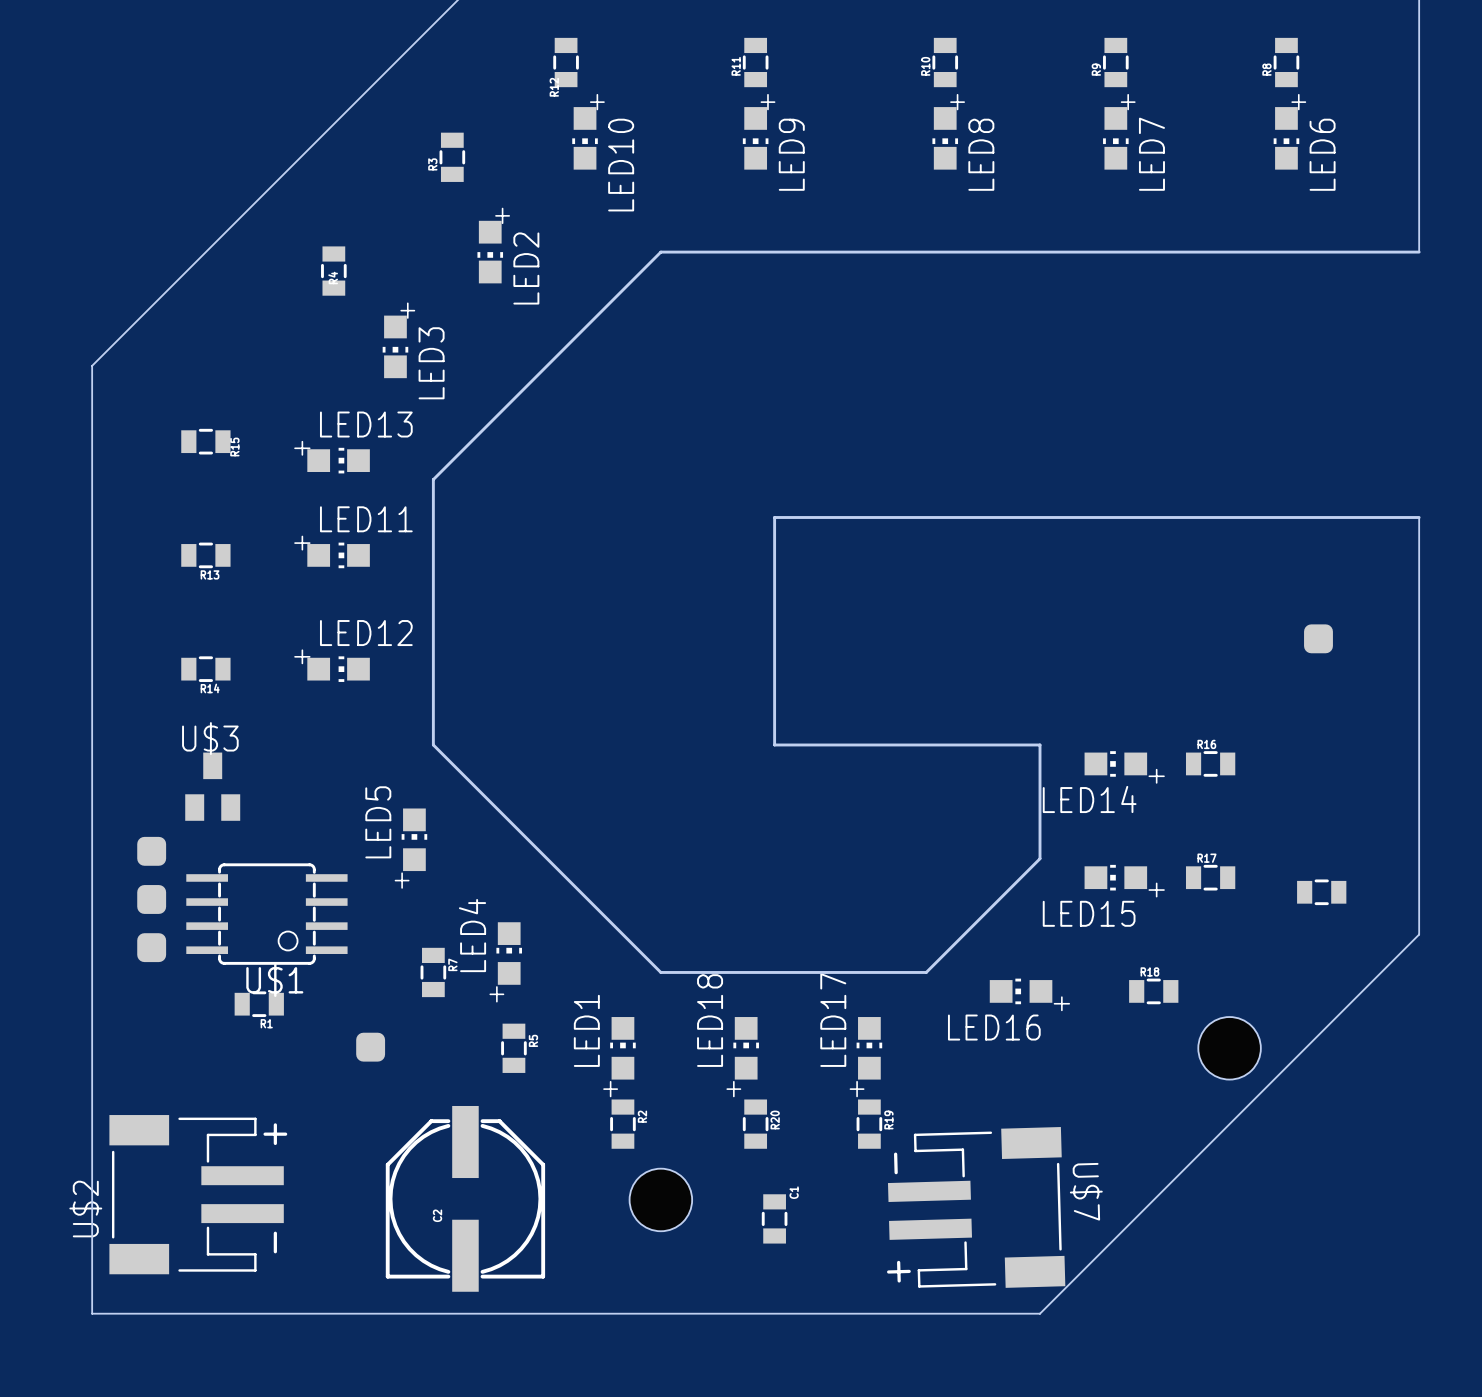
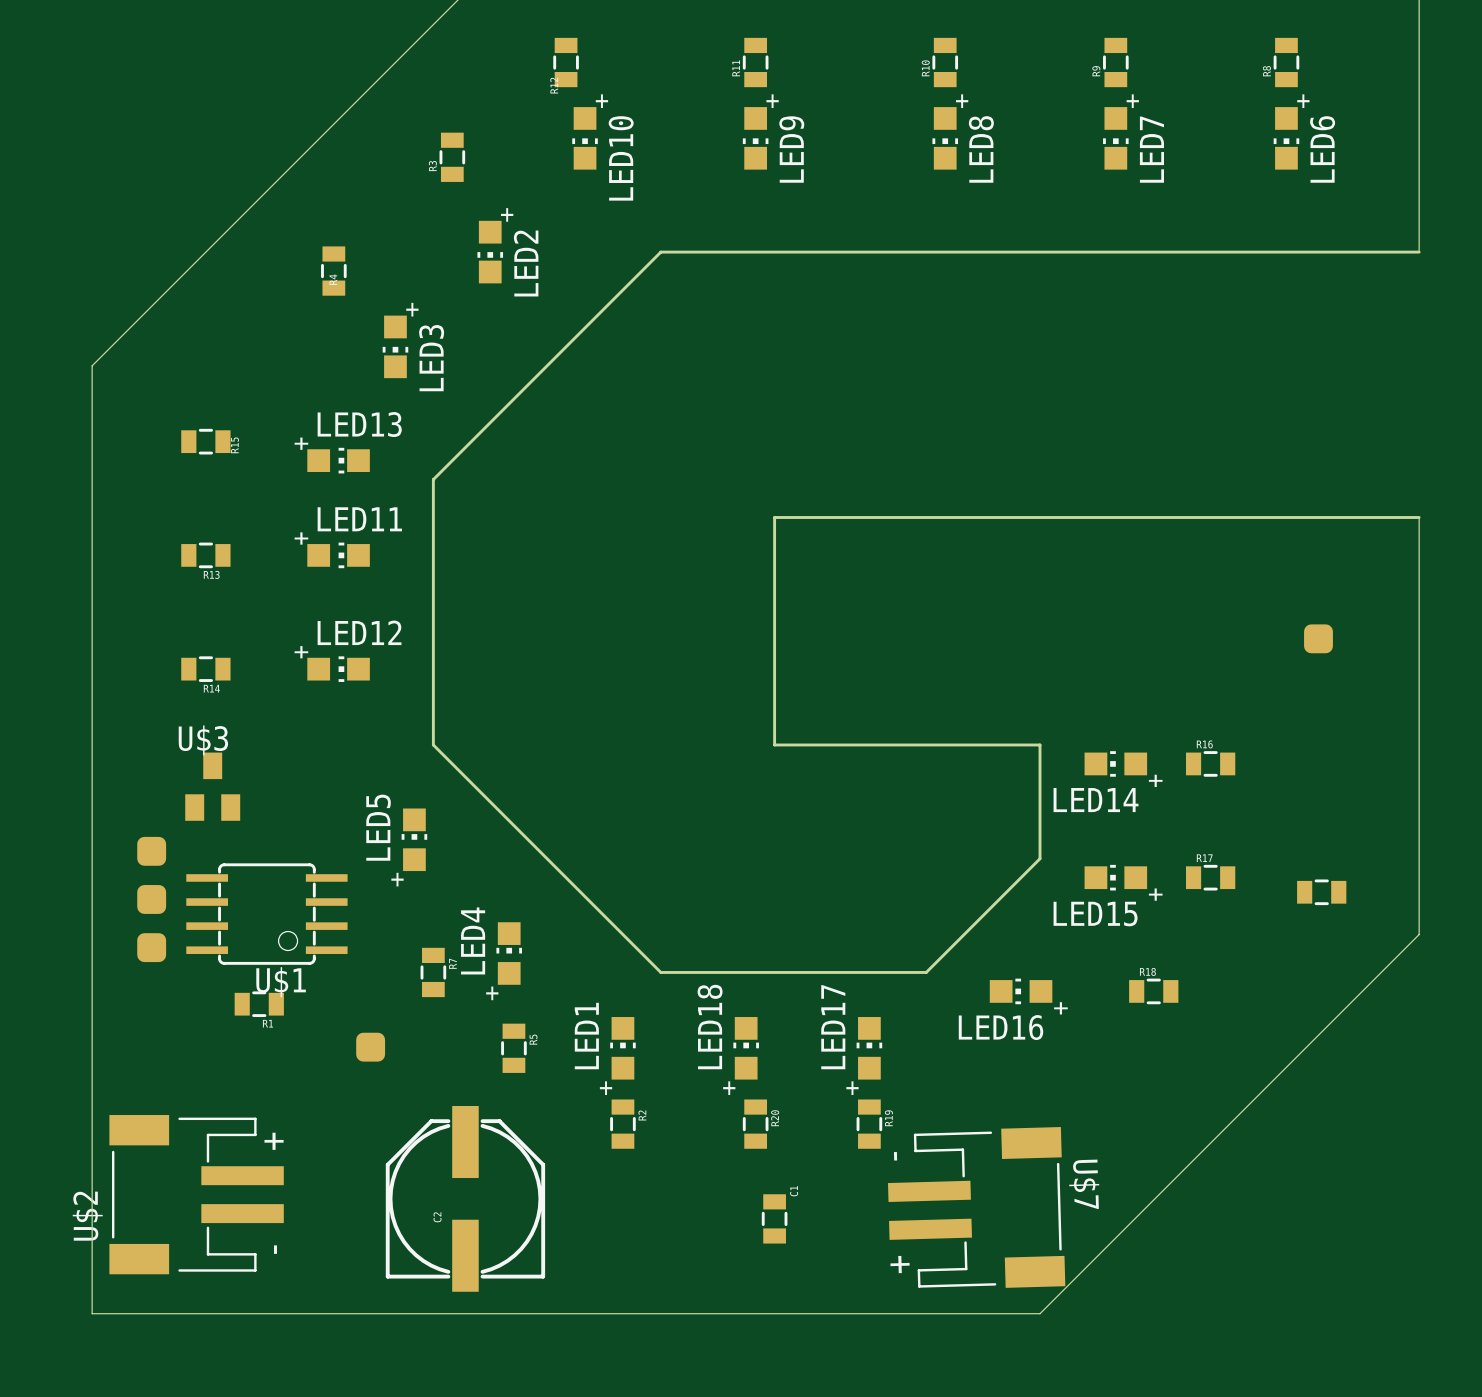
hole: (1229, 1048) -> none
hole: (660, 1199) -> none

